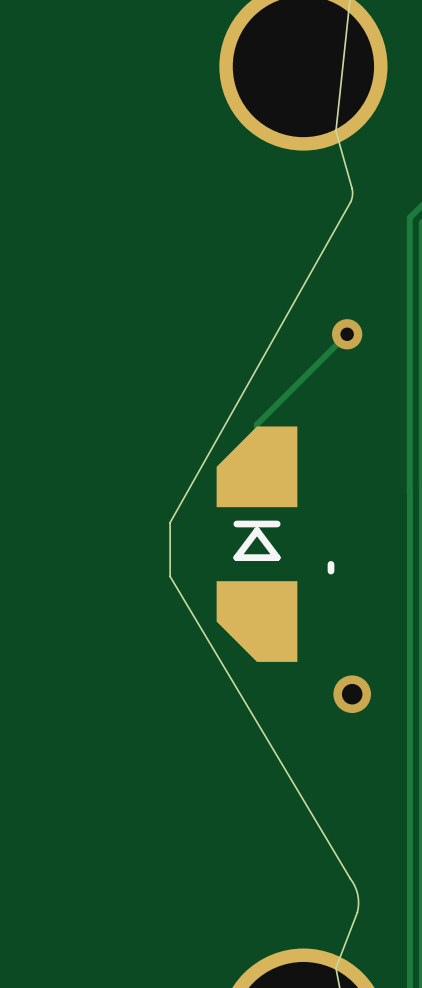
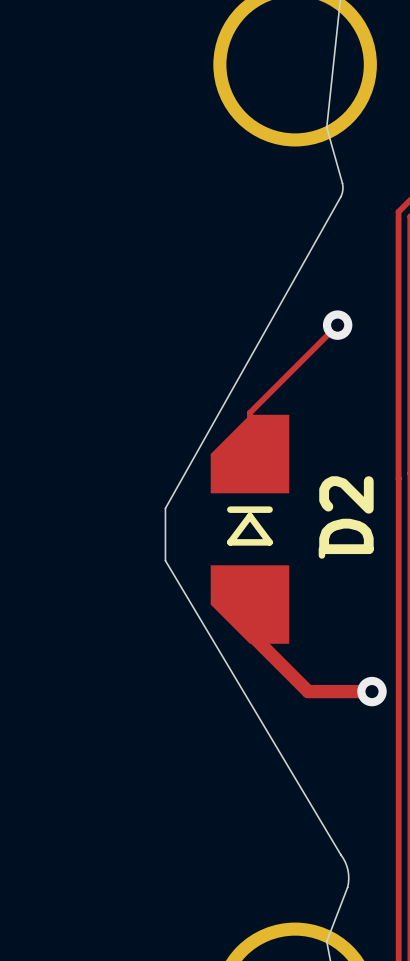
D2 name: none -> D2 (346, 515)
track: none -> (249, 604) (249, 633) (308, 691) (372, 691)
via position: (352, 694) -> (372, 691)

